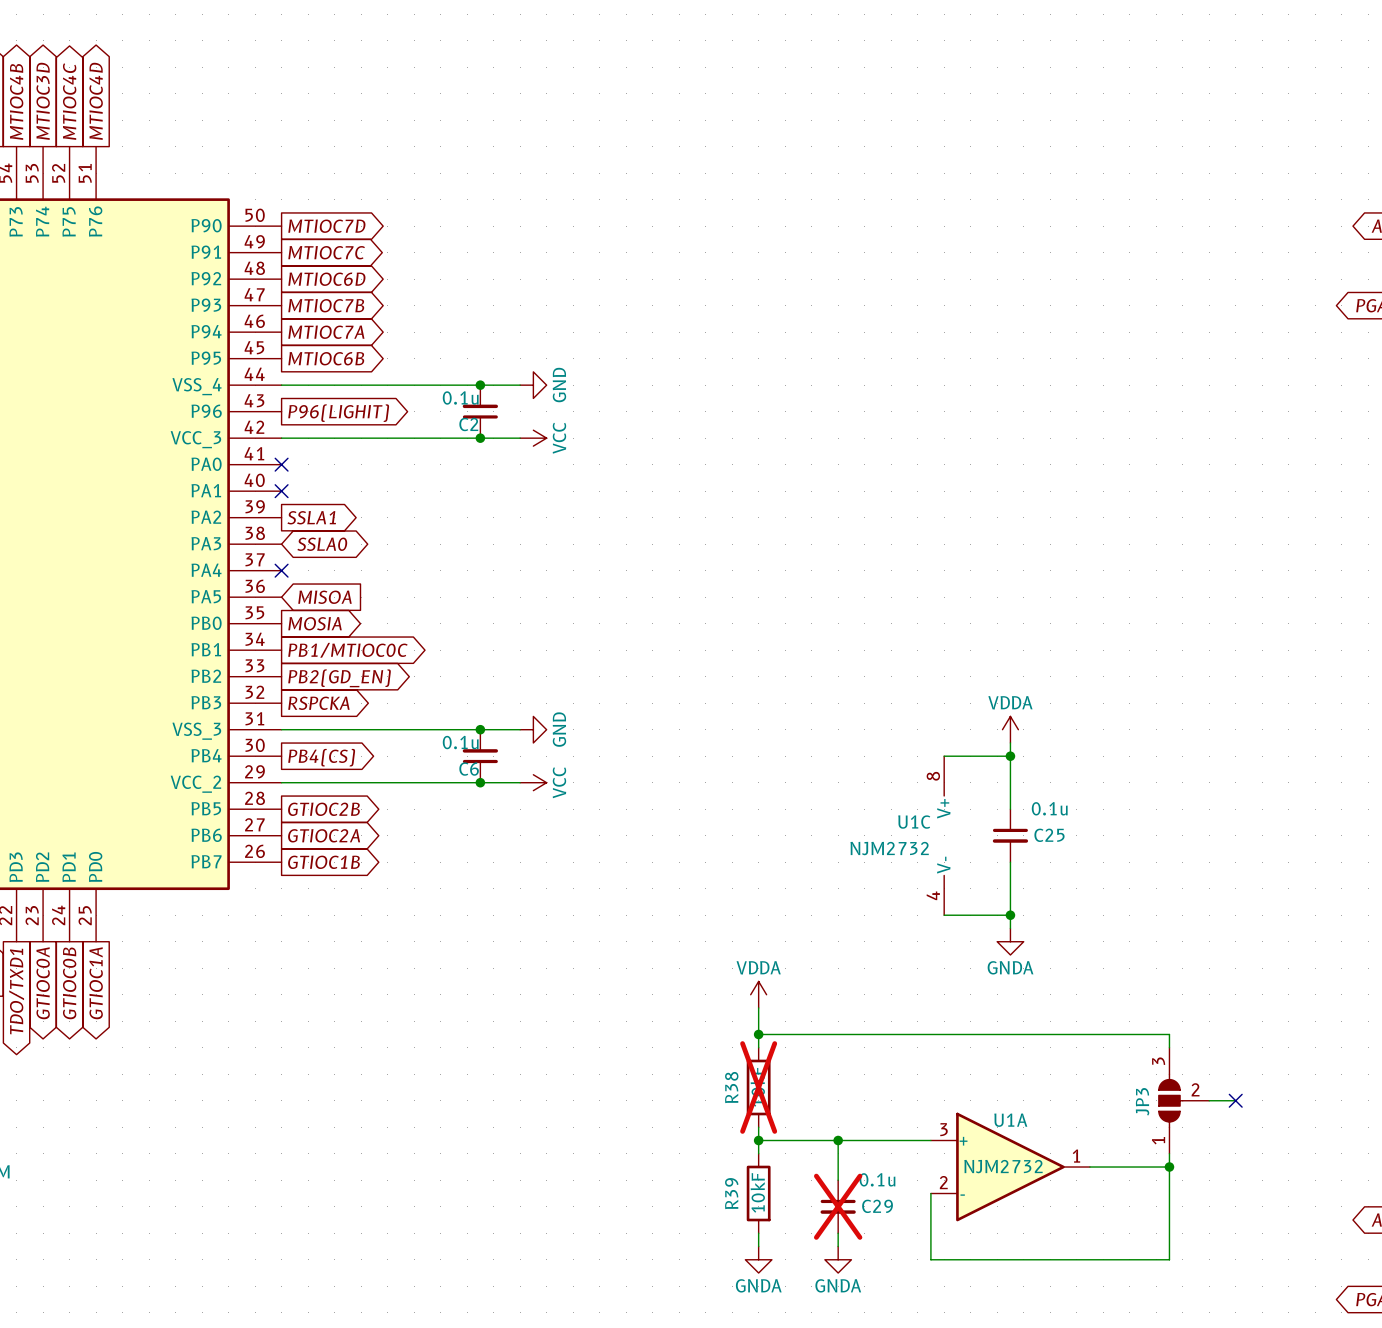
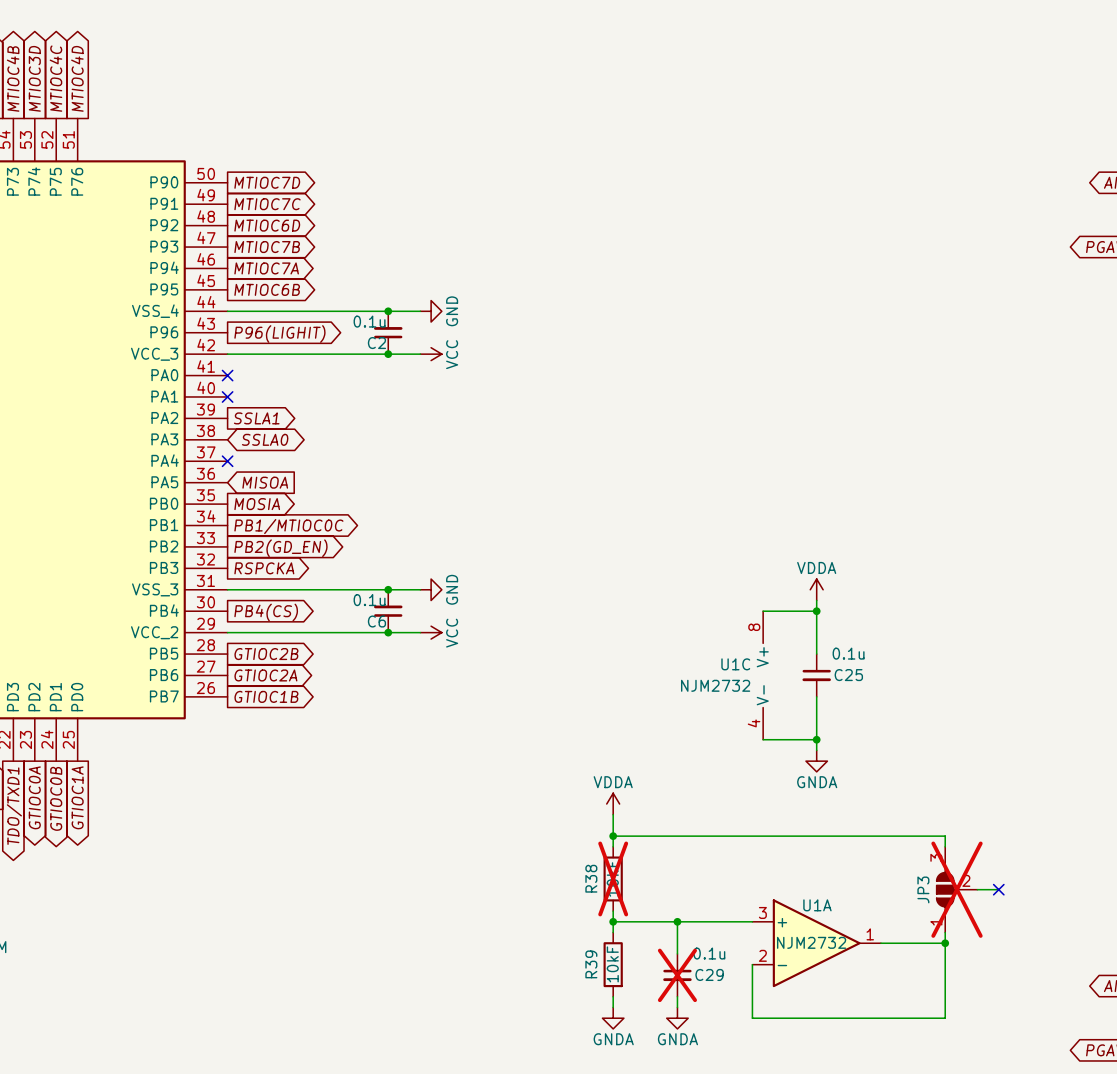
JP3 do-not-place cross: none -> (957, 889)

